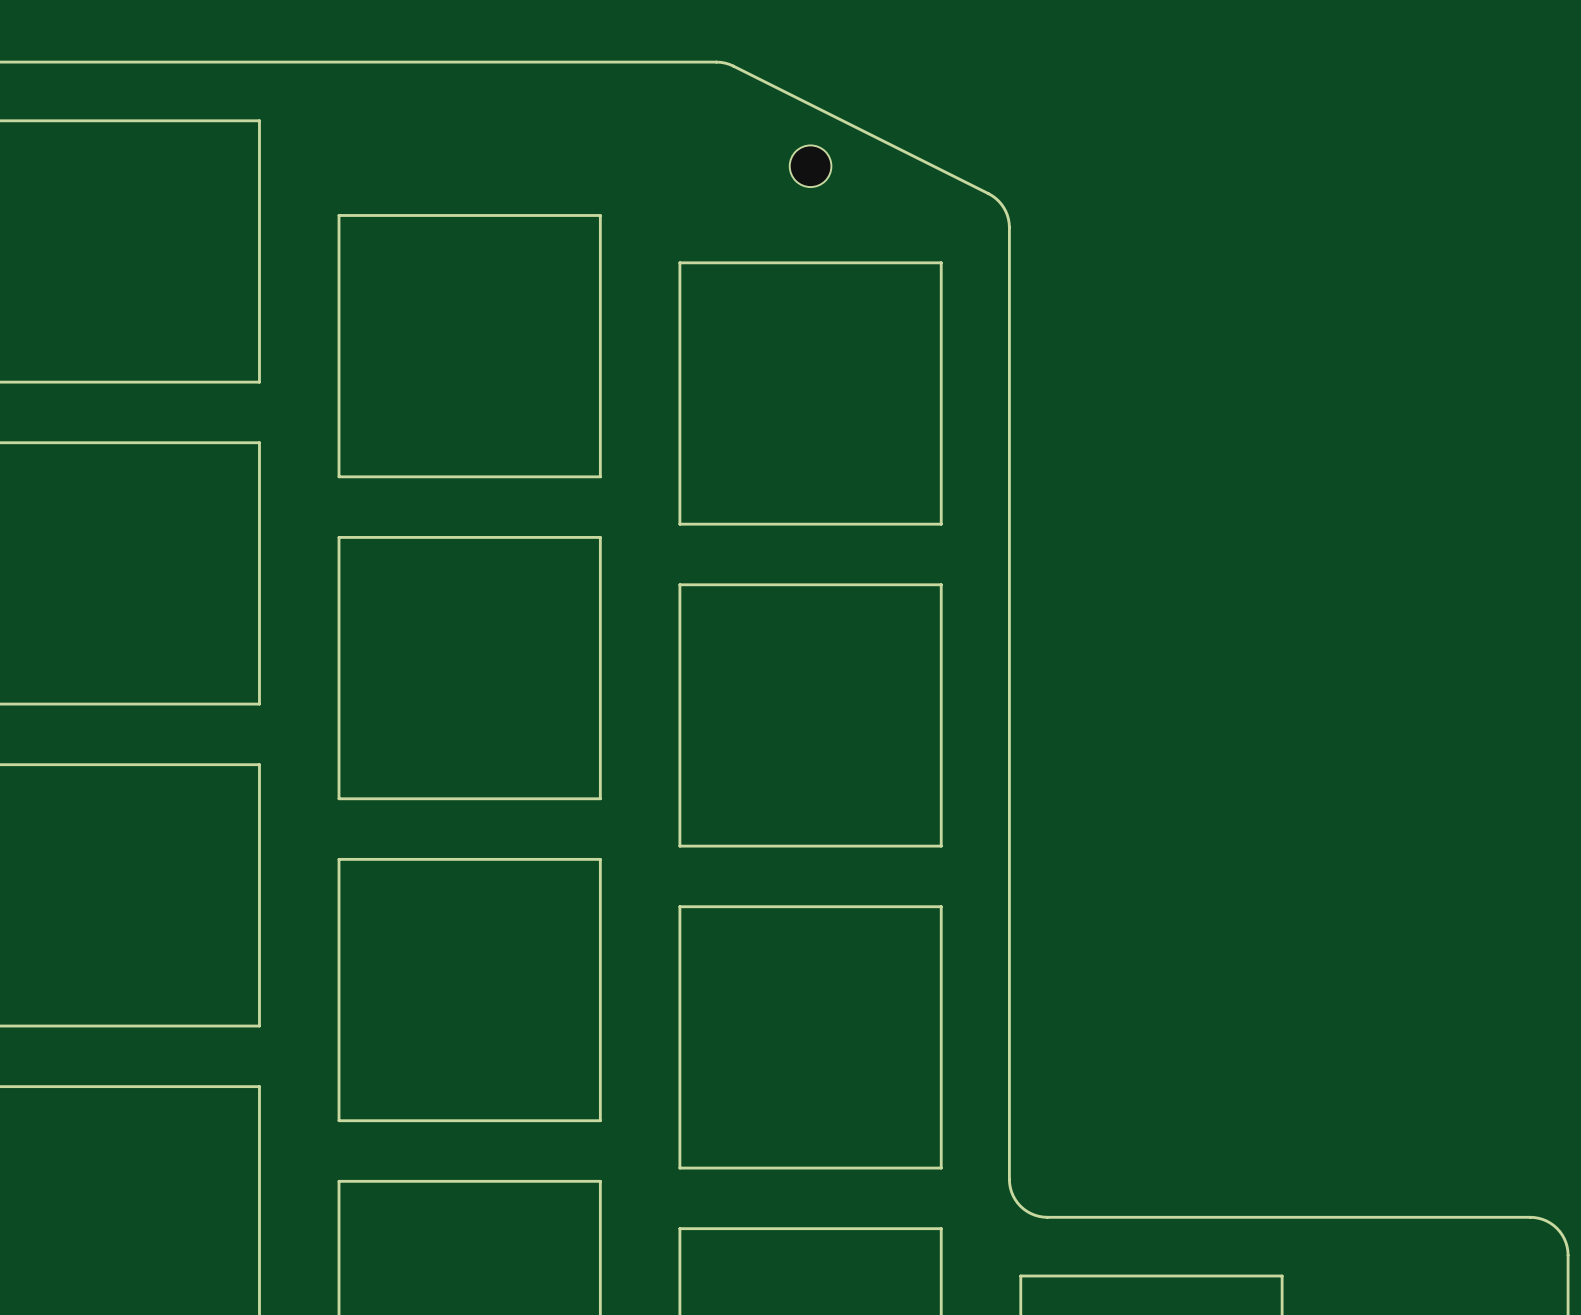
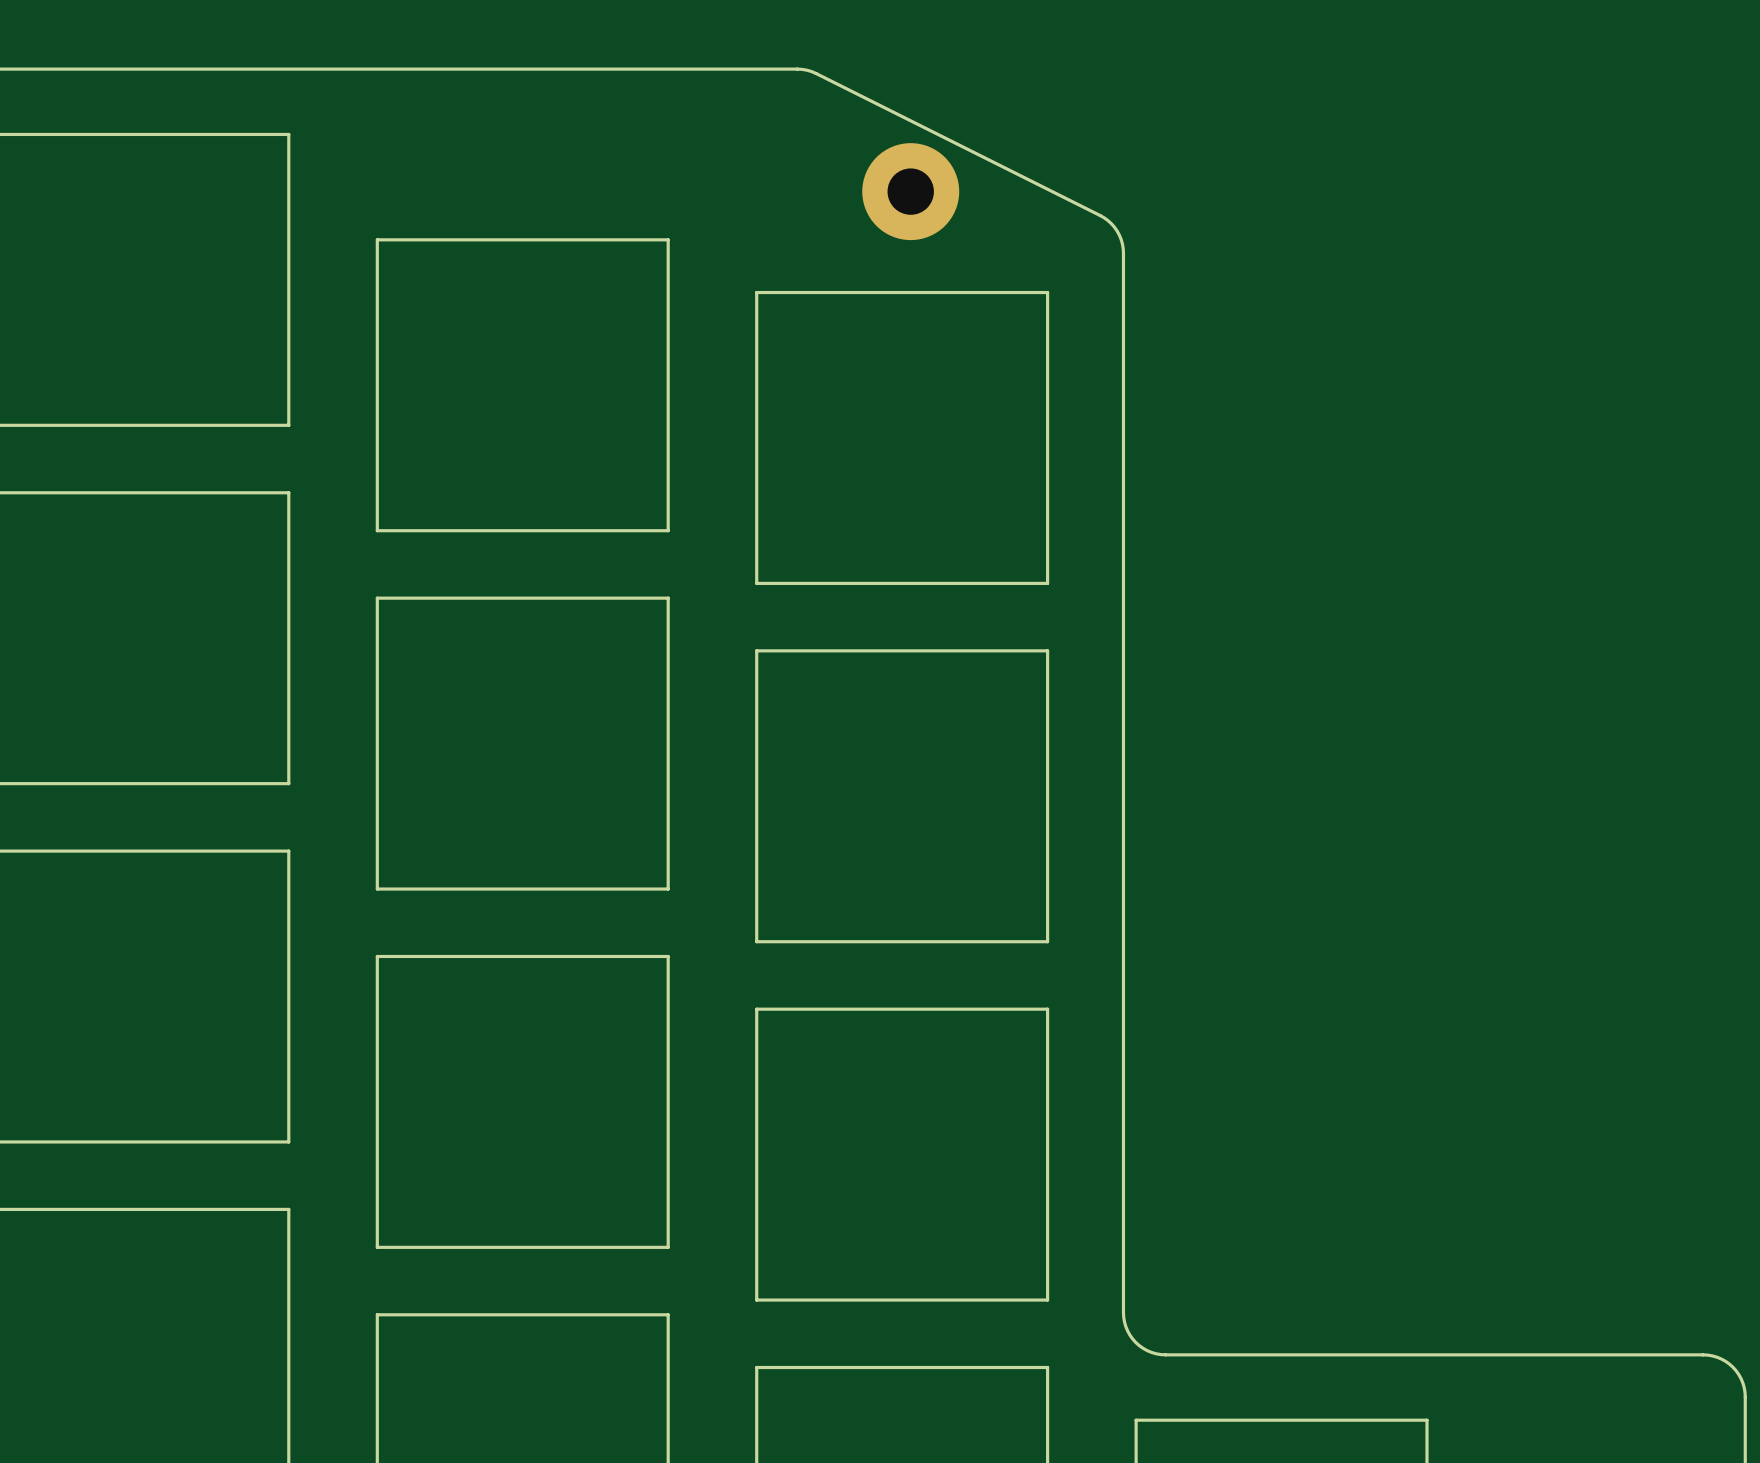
part footprint: [789, 145, 832, 188] -> [862, 143, 960, 241]

